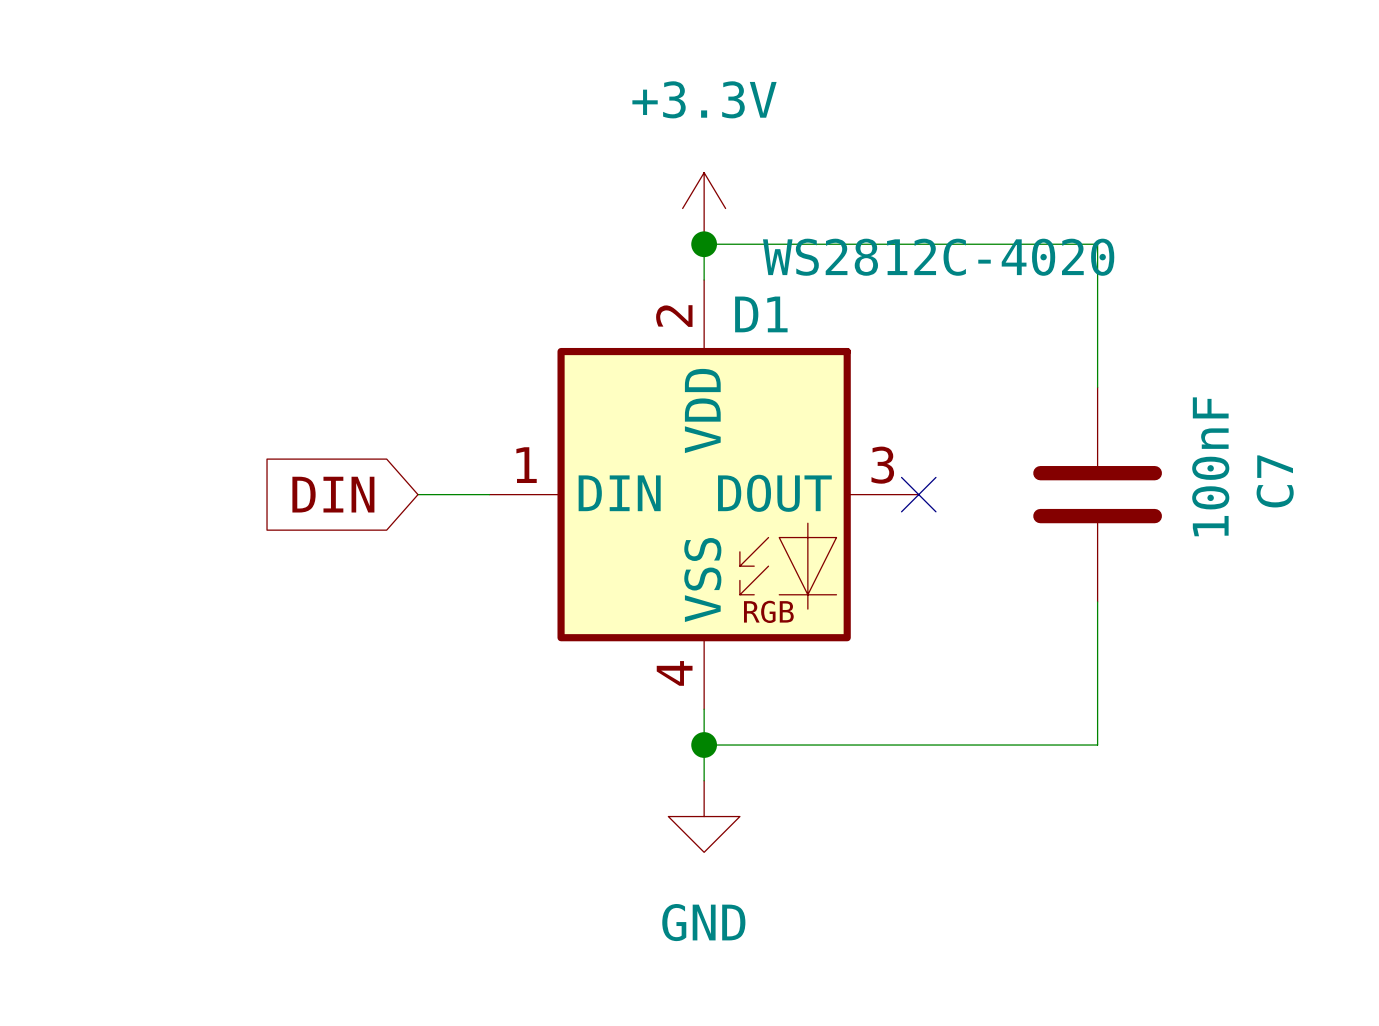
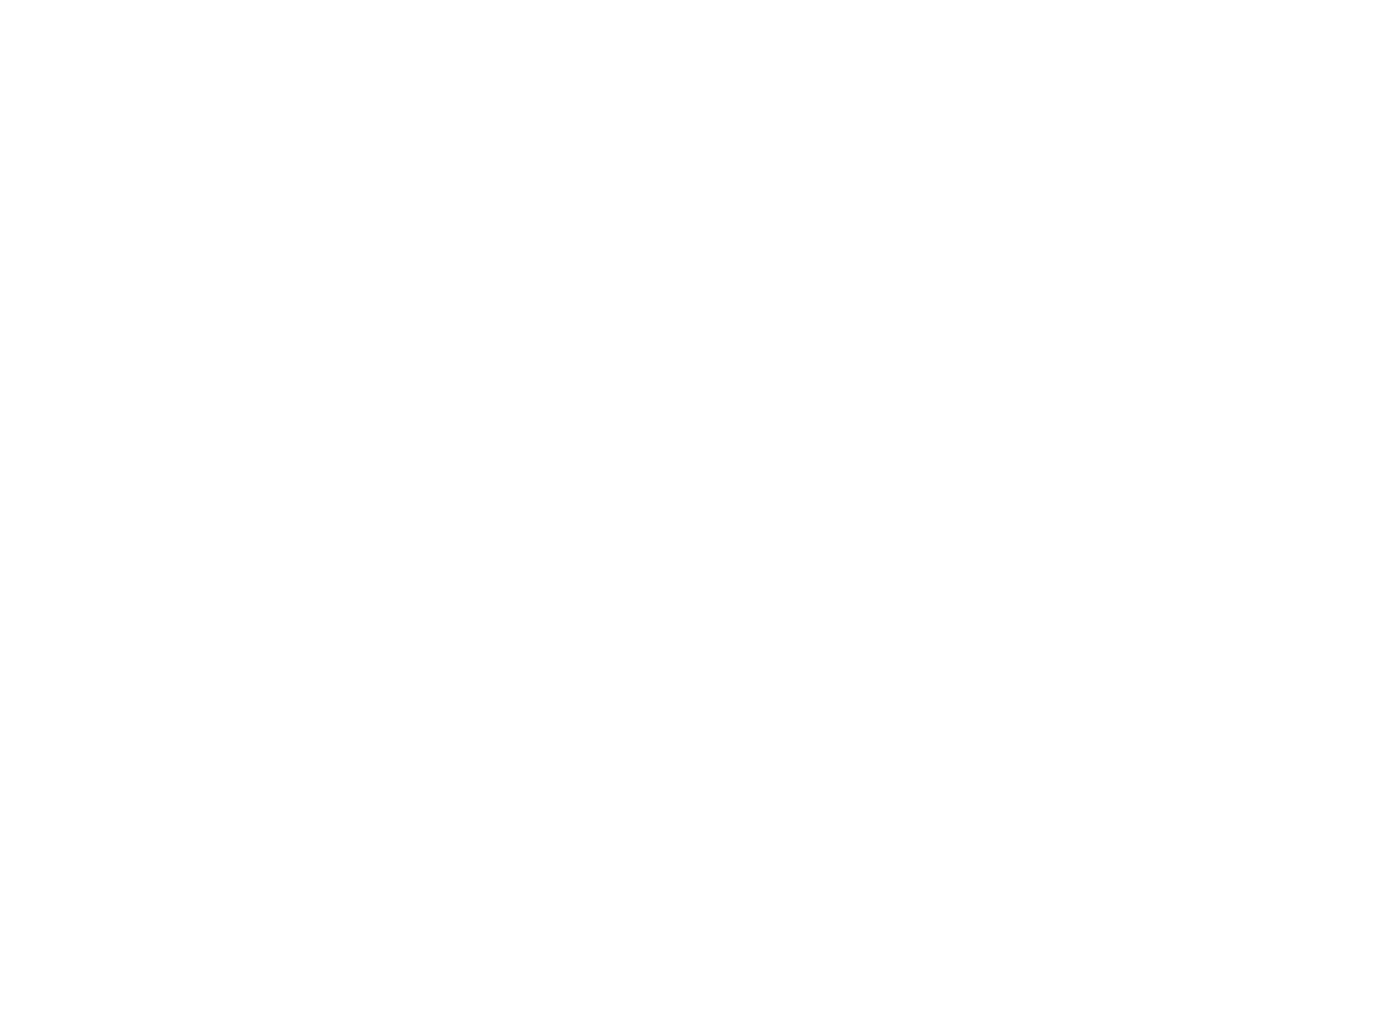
power symbol: +3.3V (704, 208) -> none
junction: (704, 244) -> none
wire: (704, 280) (704, 244) (1097, 244) (1097, 387) -> none
global label: DIN (333, 494) -> none
wire: (417, 494) (489, 494) -> none
D1: WS2812C-4020 (704, 494) -> none
no-connect mark: (918, 494) -> none
C7: 100nF (1097, 494) -> none
wire: (1097, 601) (1097, 745) (704, 745) -> none
wire: (704, 709) (704, 780) -> none
junction: (704, 745) -> none
power symbol: GND (704, 816) -> none

